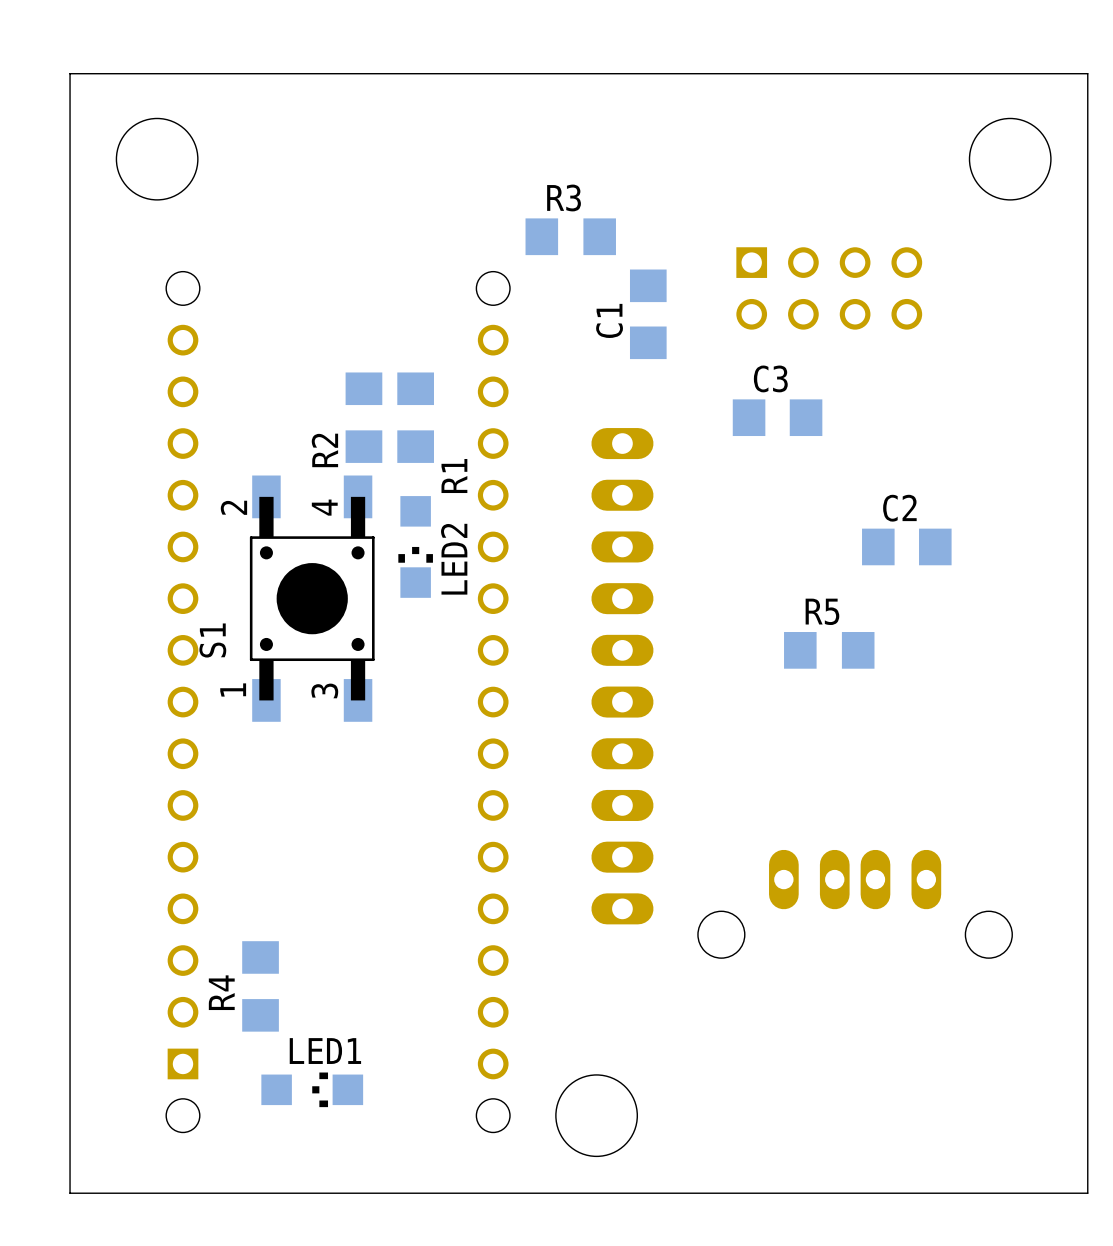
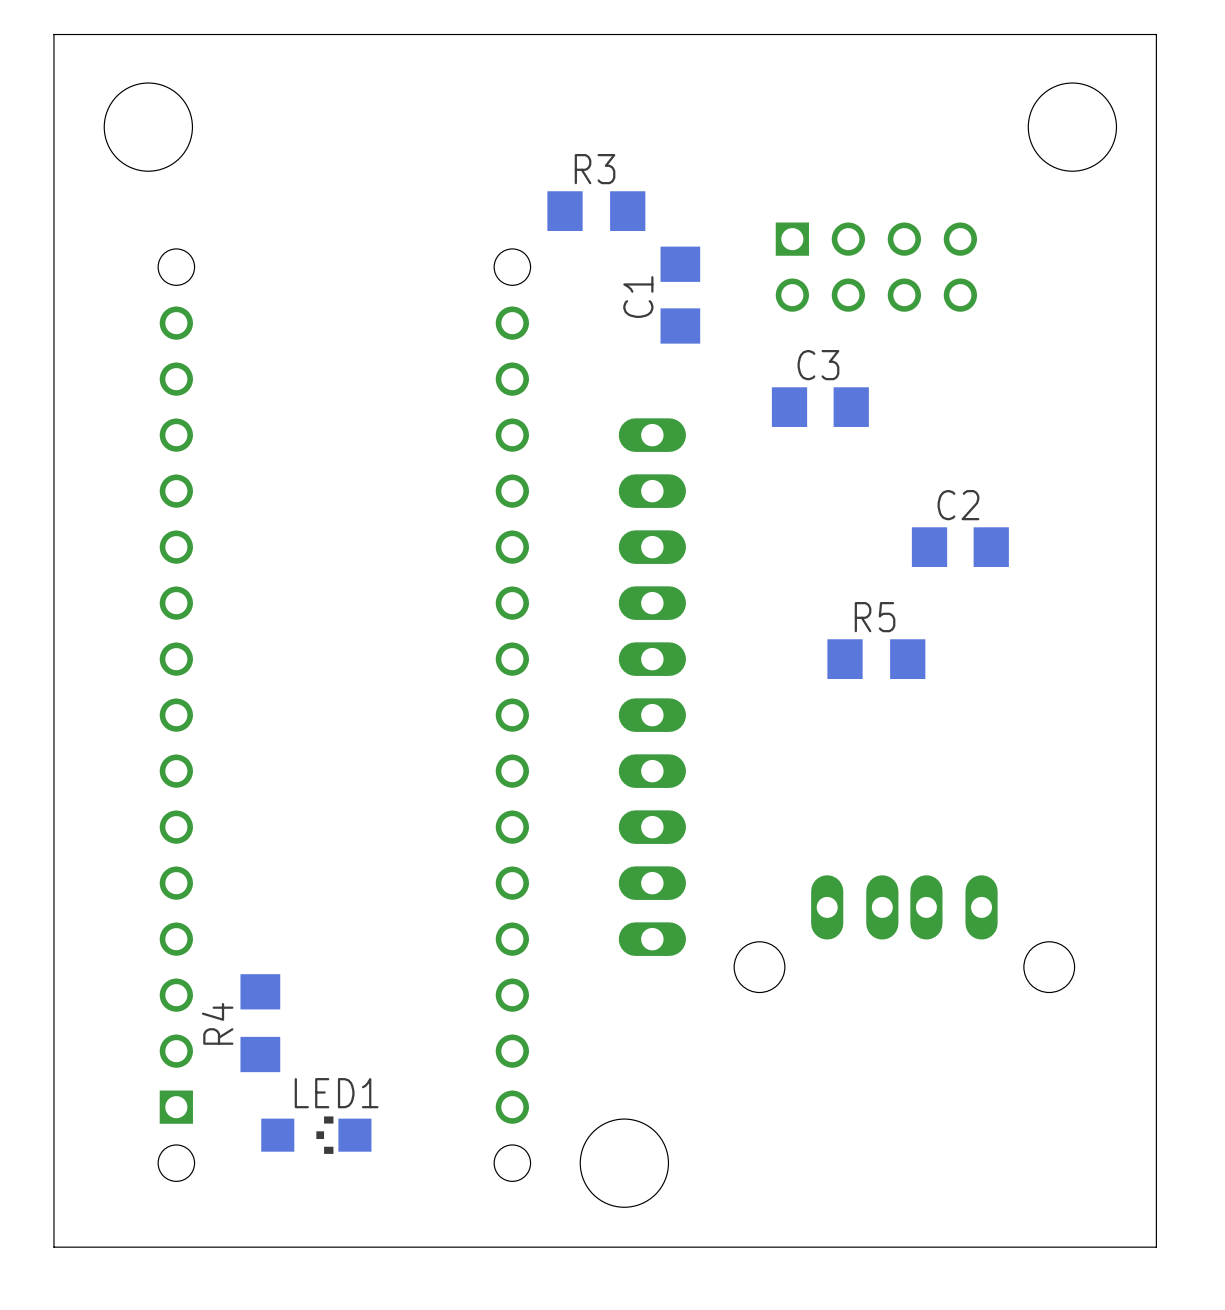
R2: (363, 417) -> none
R1: (415, 417) -> none
LED2: (415, 546) -> none
S1: (312, 598) -> none

